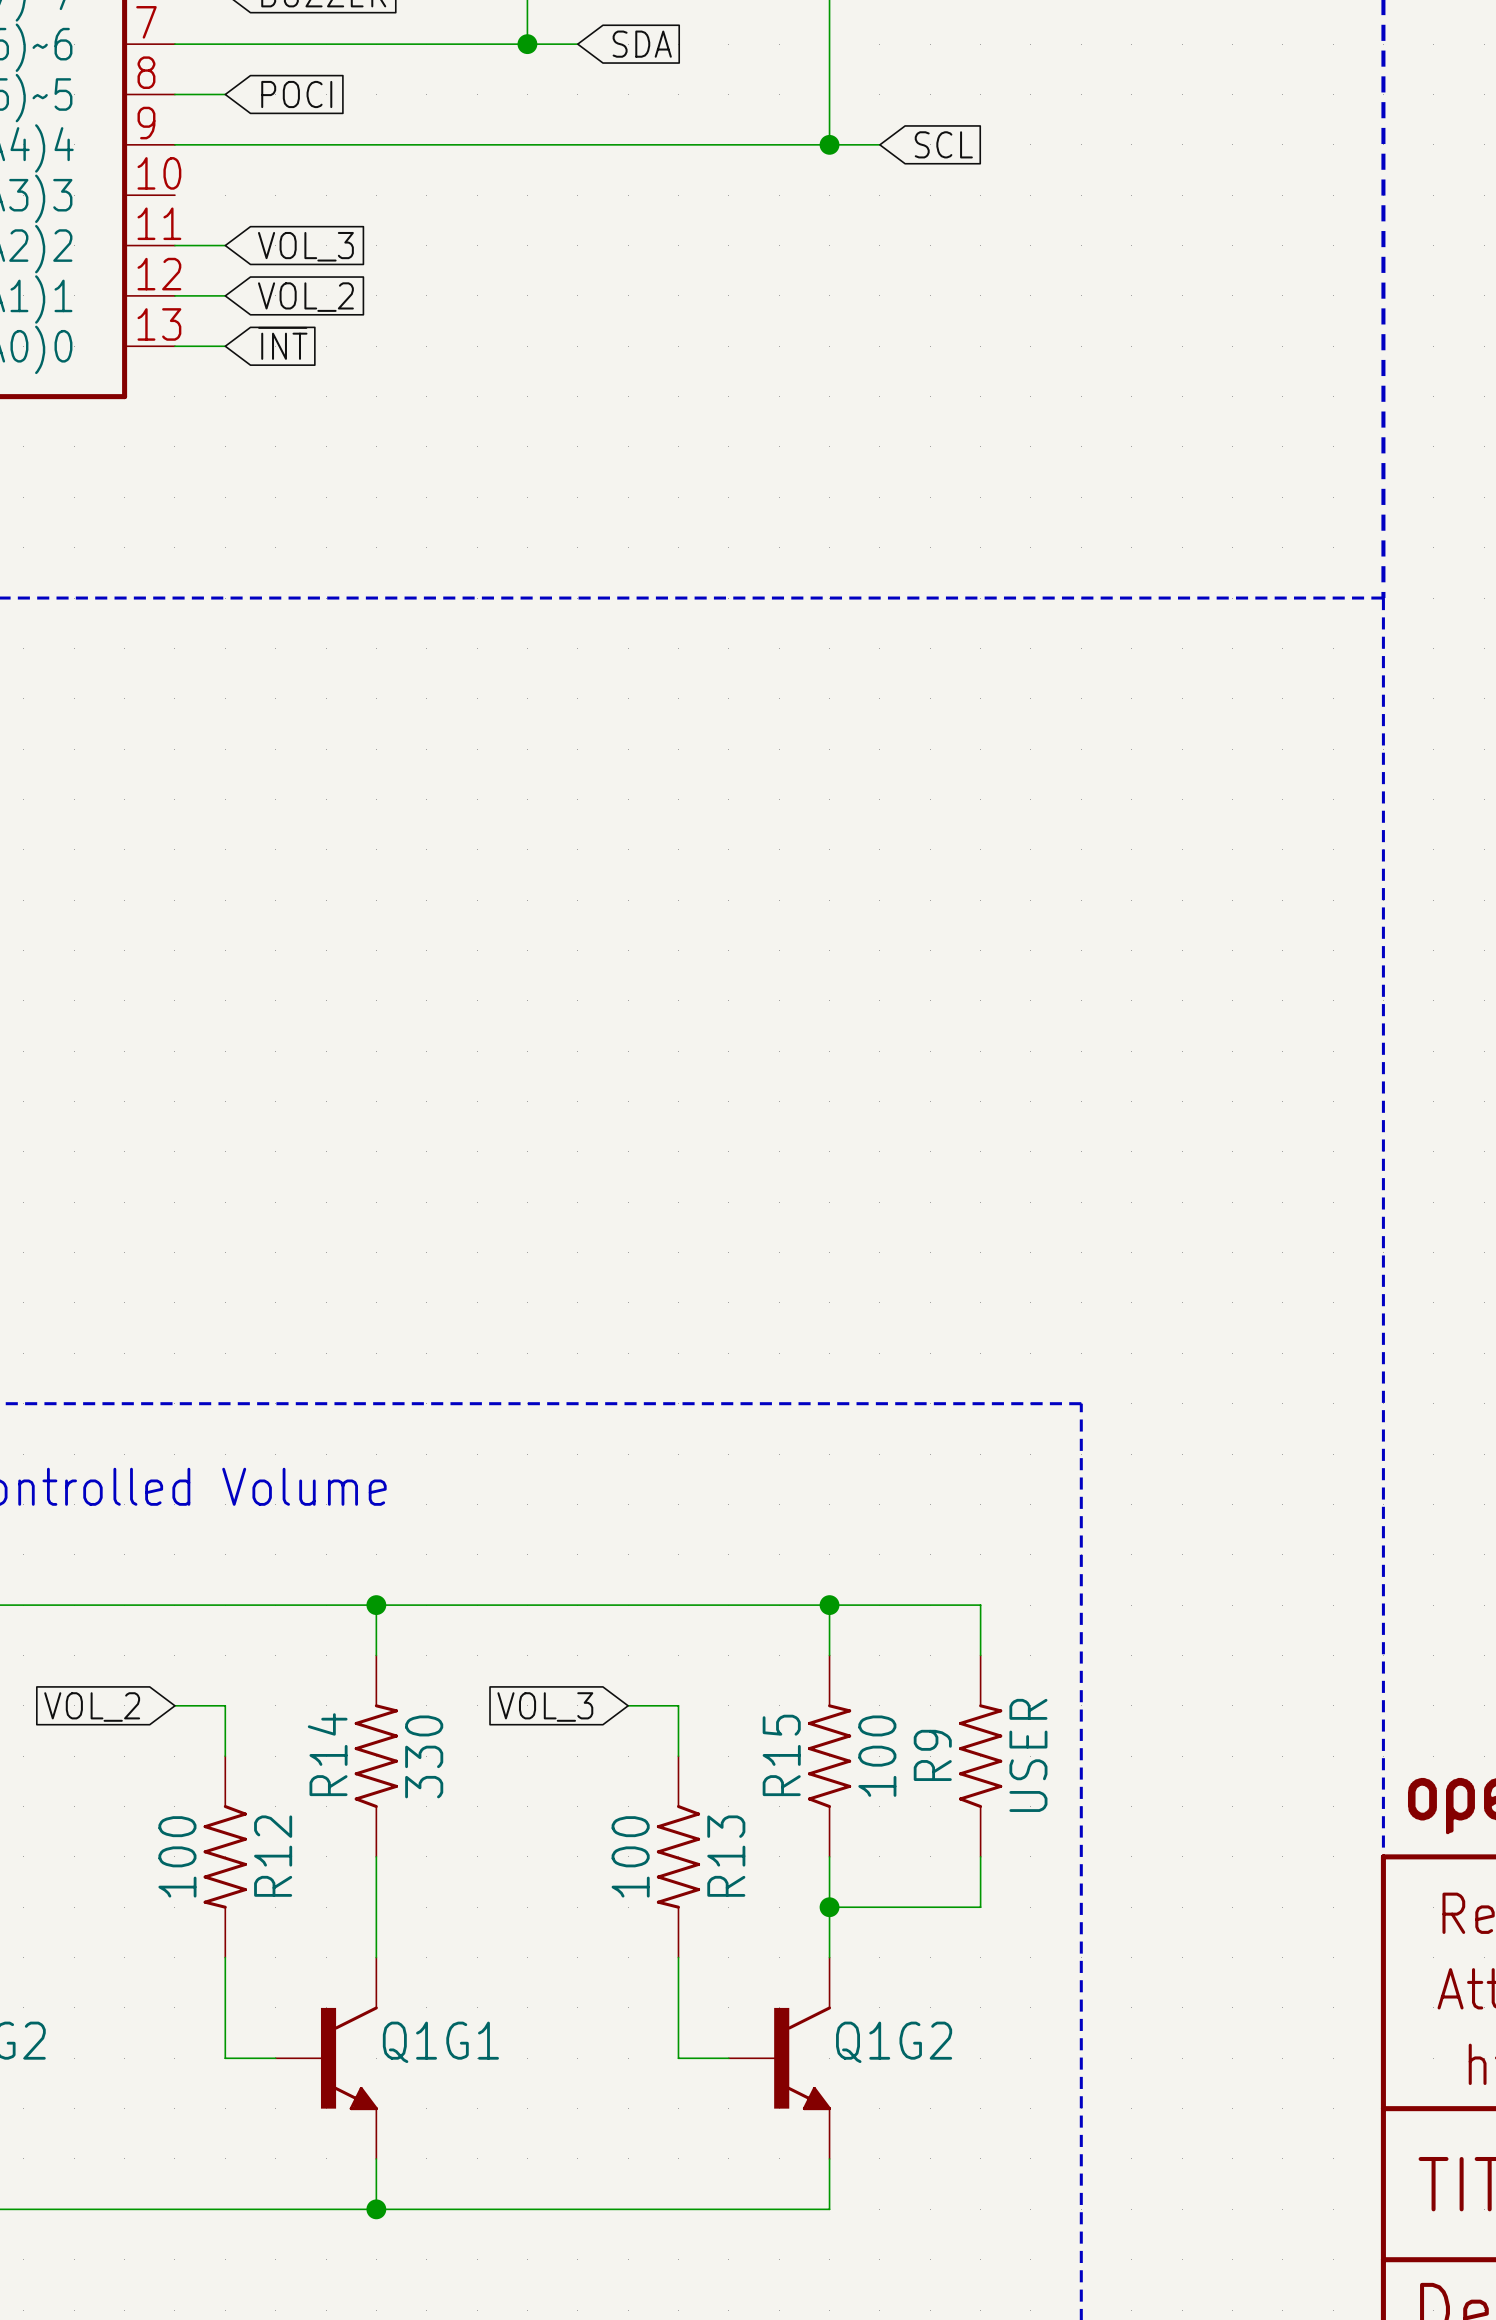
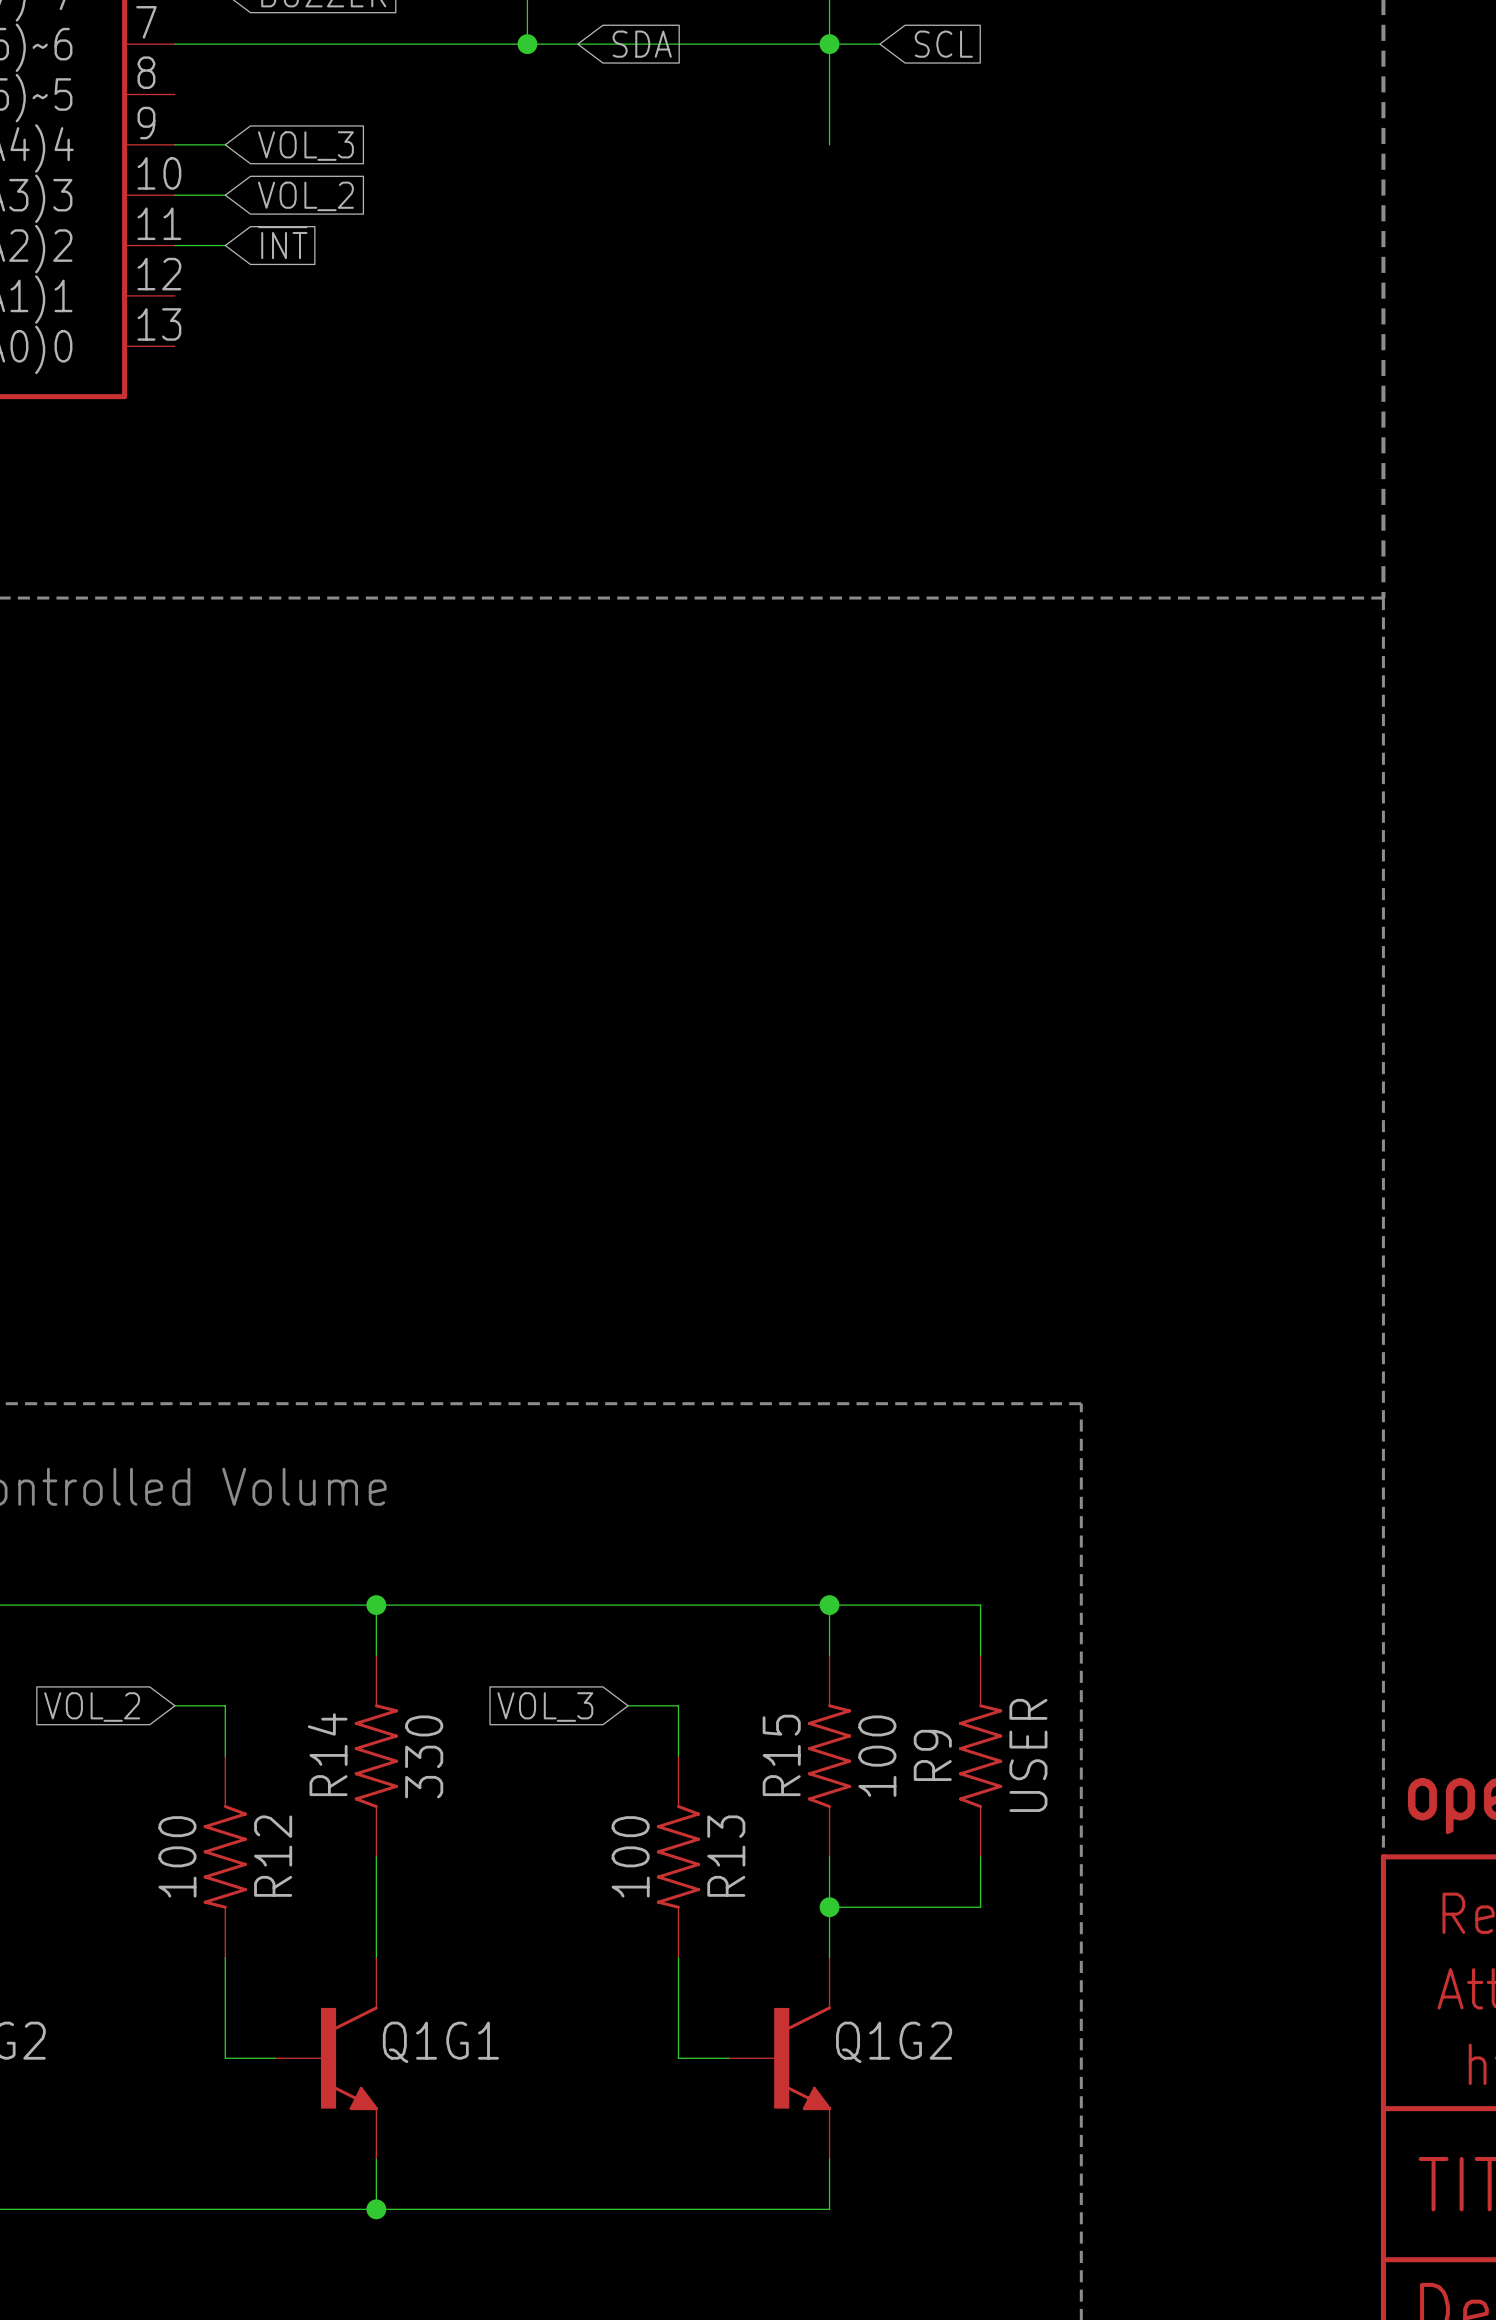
wire: none -> (577, 44) (879, 44)
wire: (174, 94) (225, 94) -> none
global label: POCI (296, 94) -> none
wire: (225, 144) (879, 144) -> none
junction position: (829, 144) -> (829, 44)
global label position: SCL (943, 144) -> SCL (943, 44)
global label: none -> VOL_3 (305, 146)
global label: VOL_3 (305, 246) -> ~{INT} (282, 242)
wire: (174, 295) (225, 295) -> (174, 195) (225, 195)
global label position: VOL_2 (305, 297) -> VOL_2 (305, 196)
global label: ~{INT} (282, 343) -> none
wire: (174, 346) (225, 346) -> none

